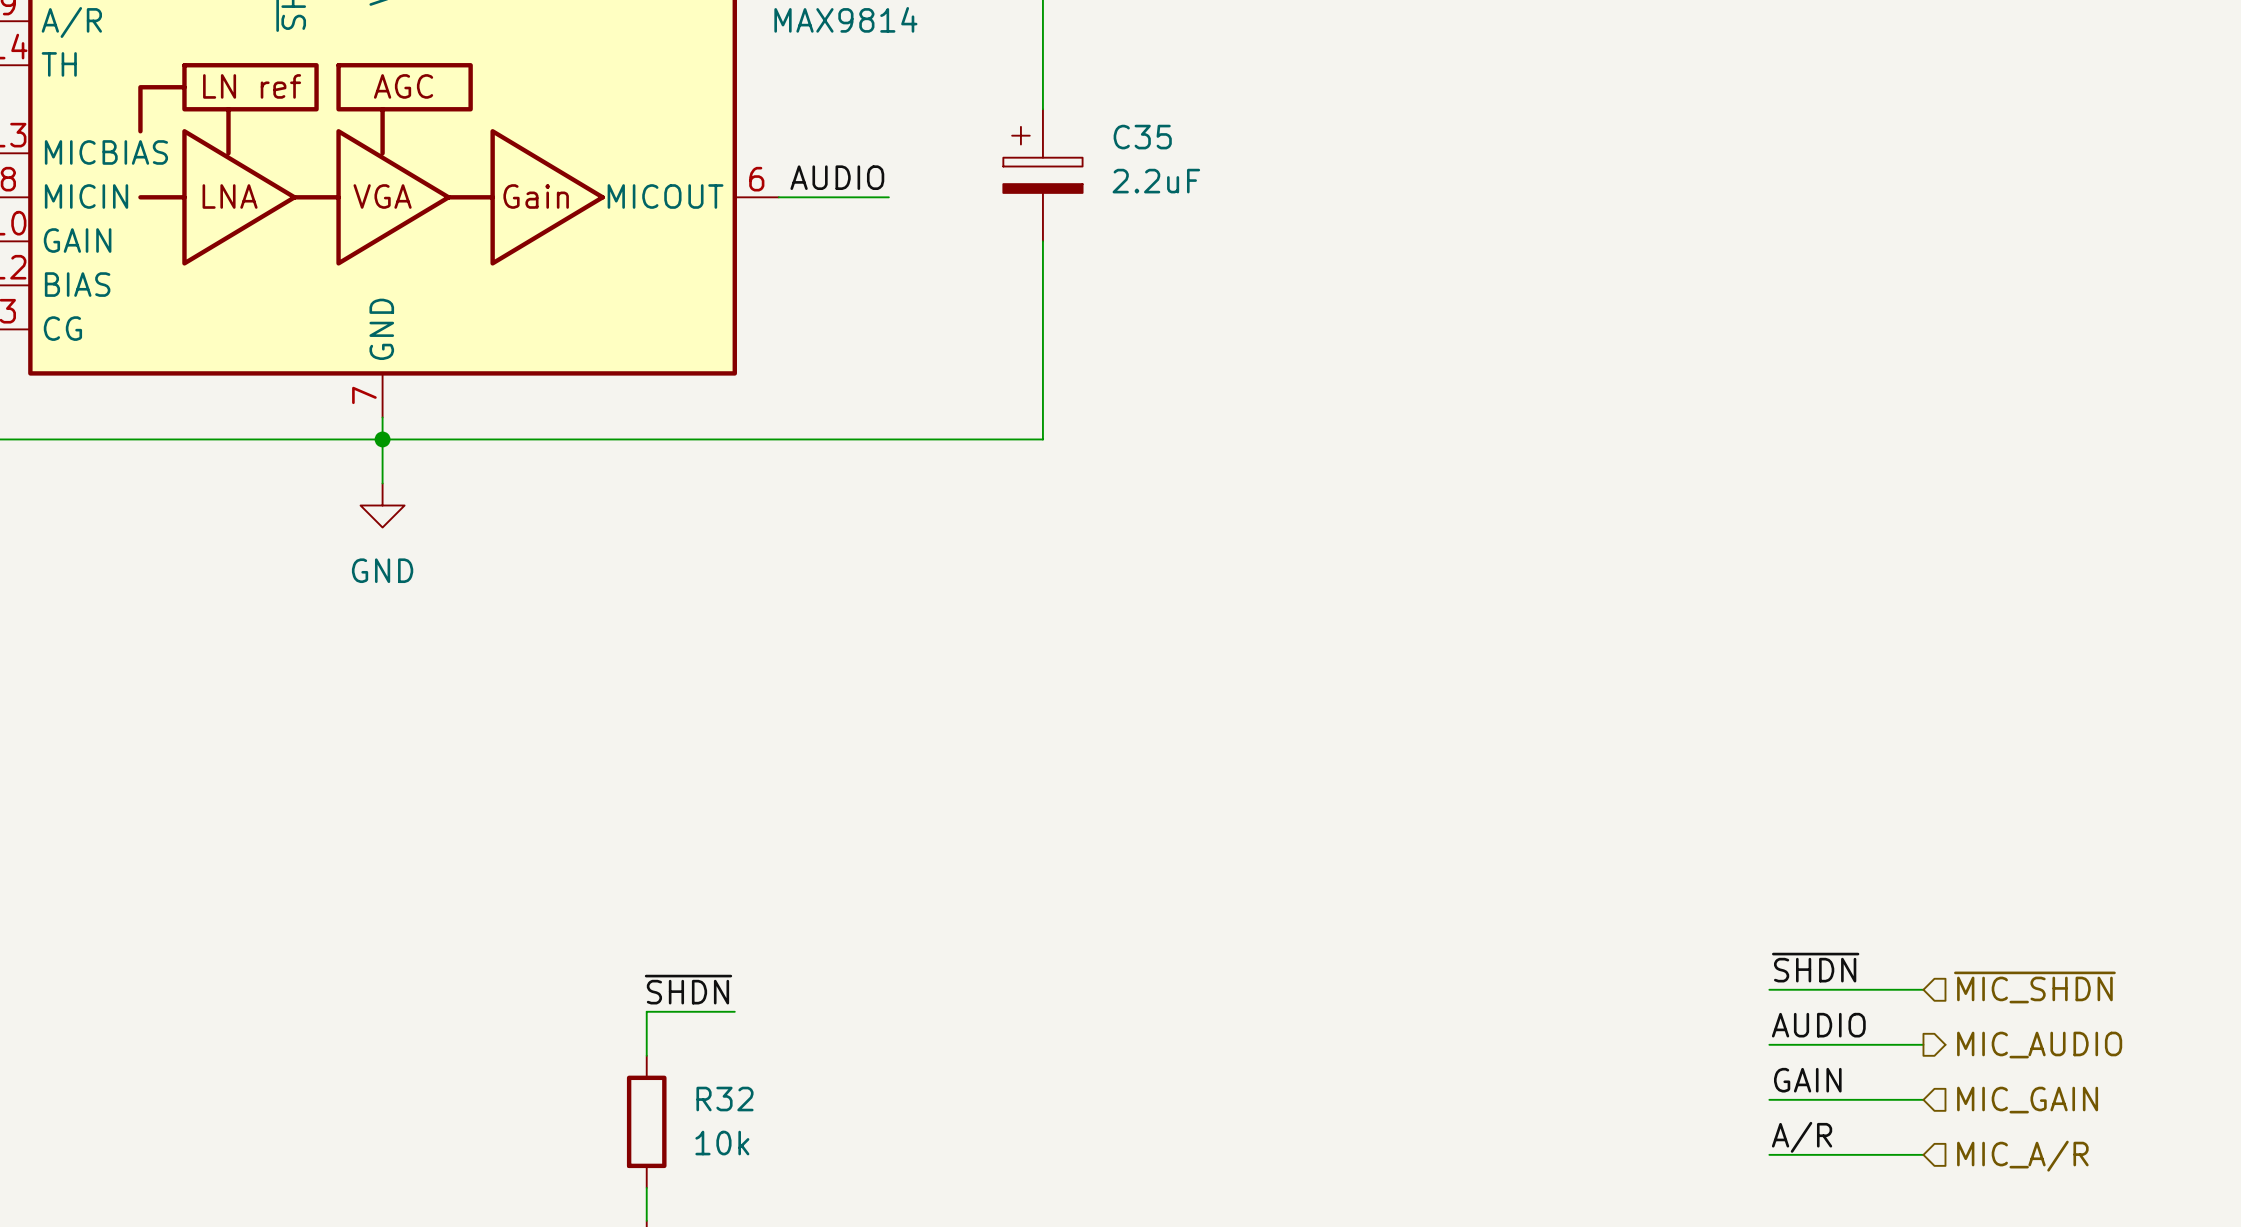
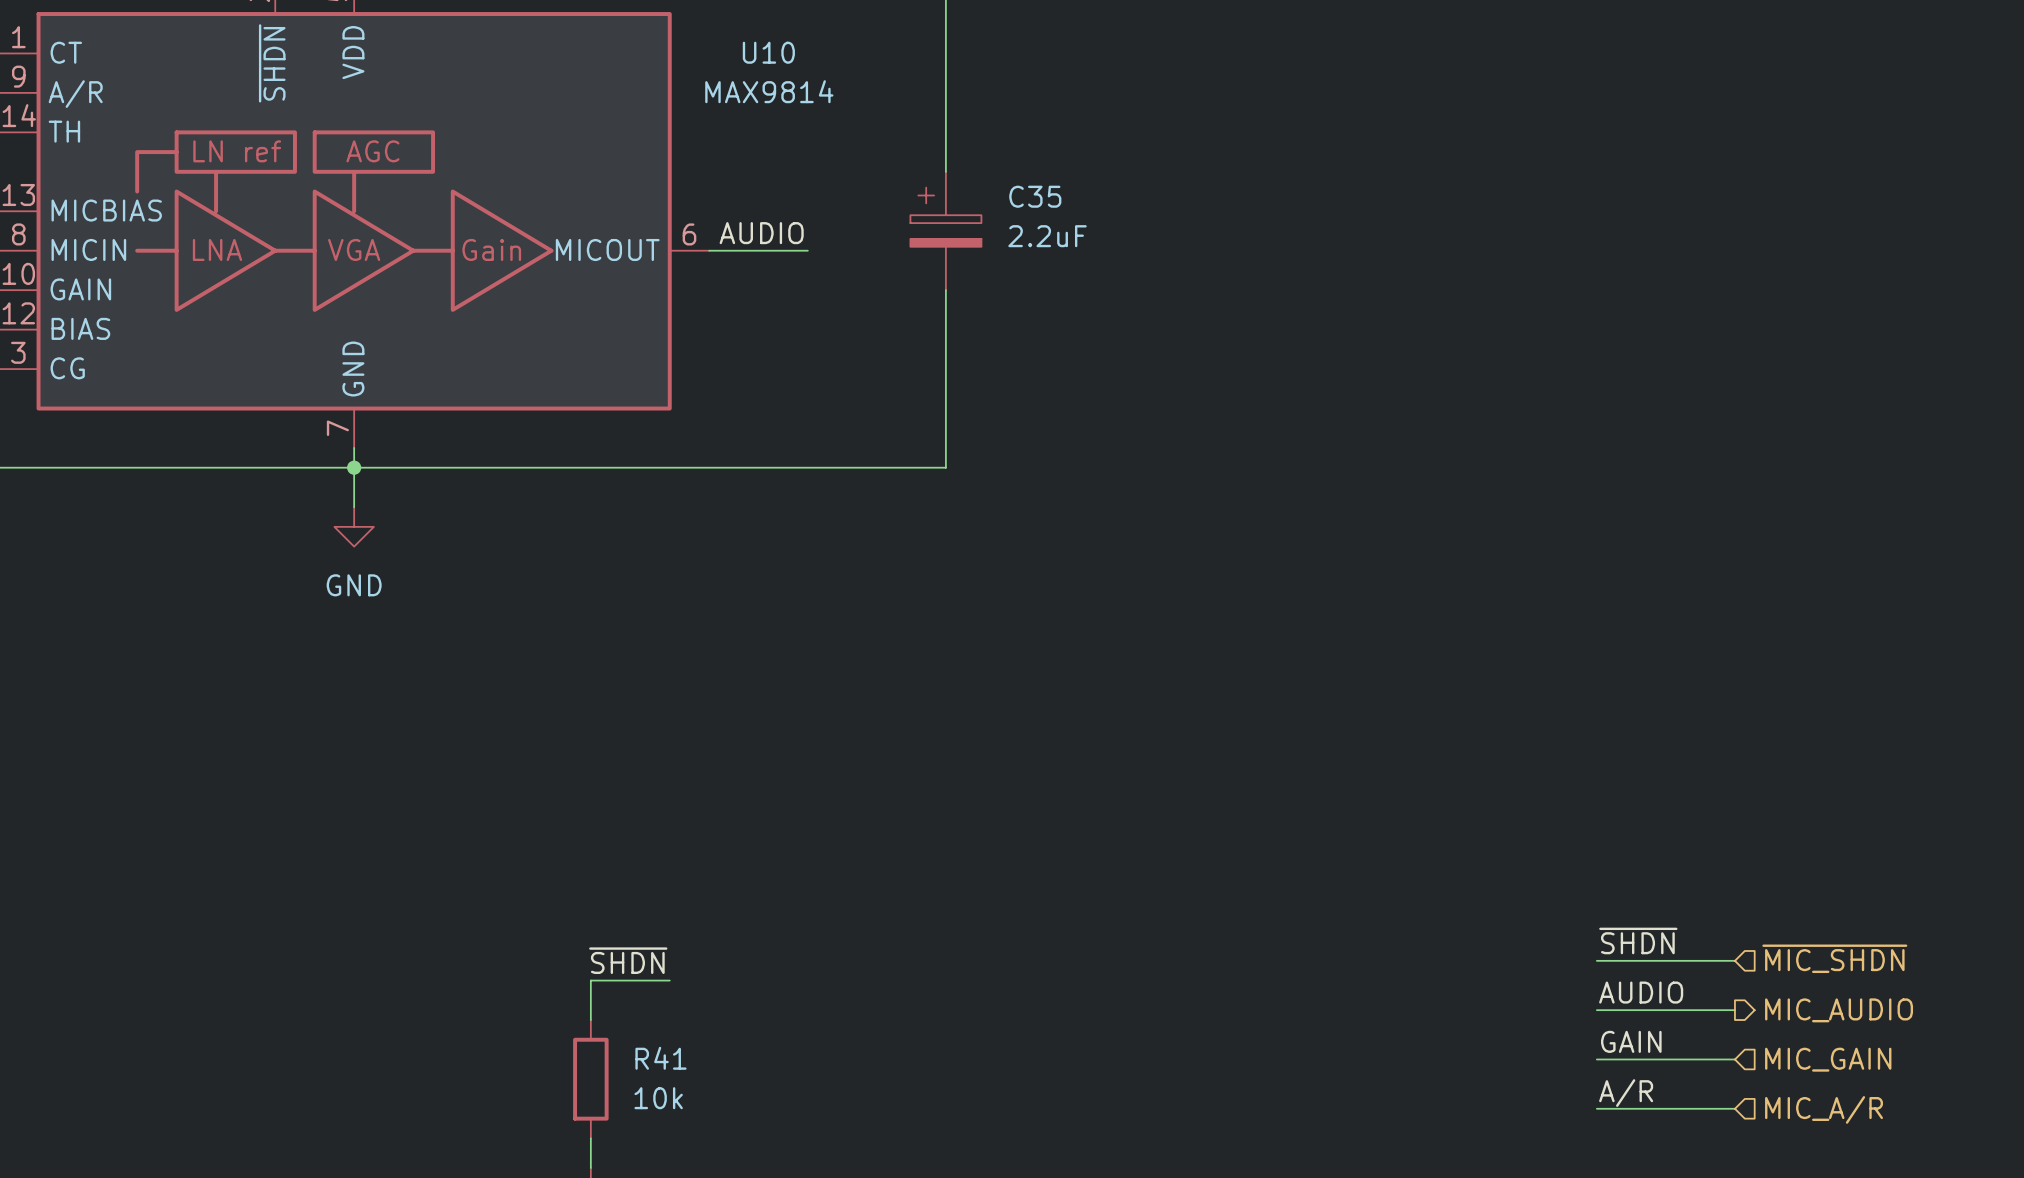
R32 name: R32 (724, 1099) -> R41 (660, 1058)

